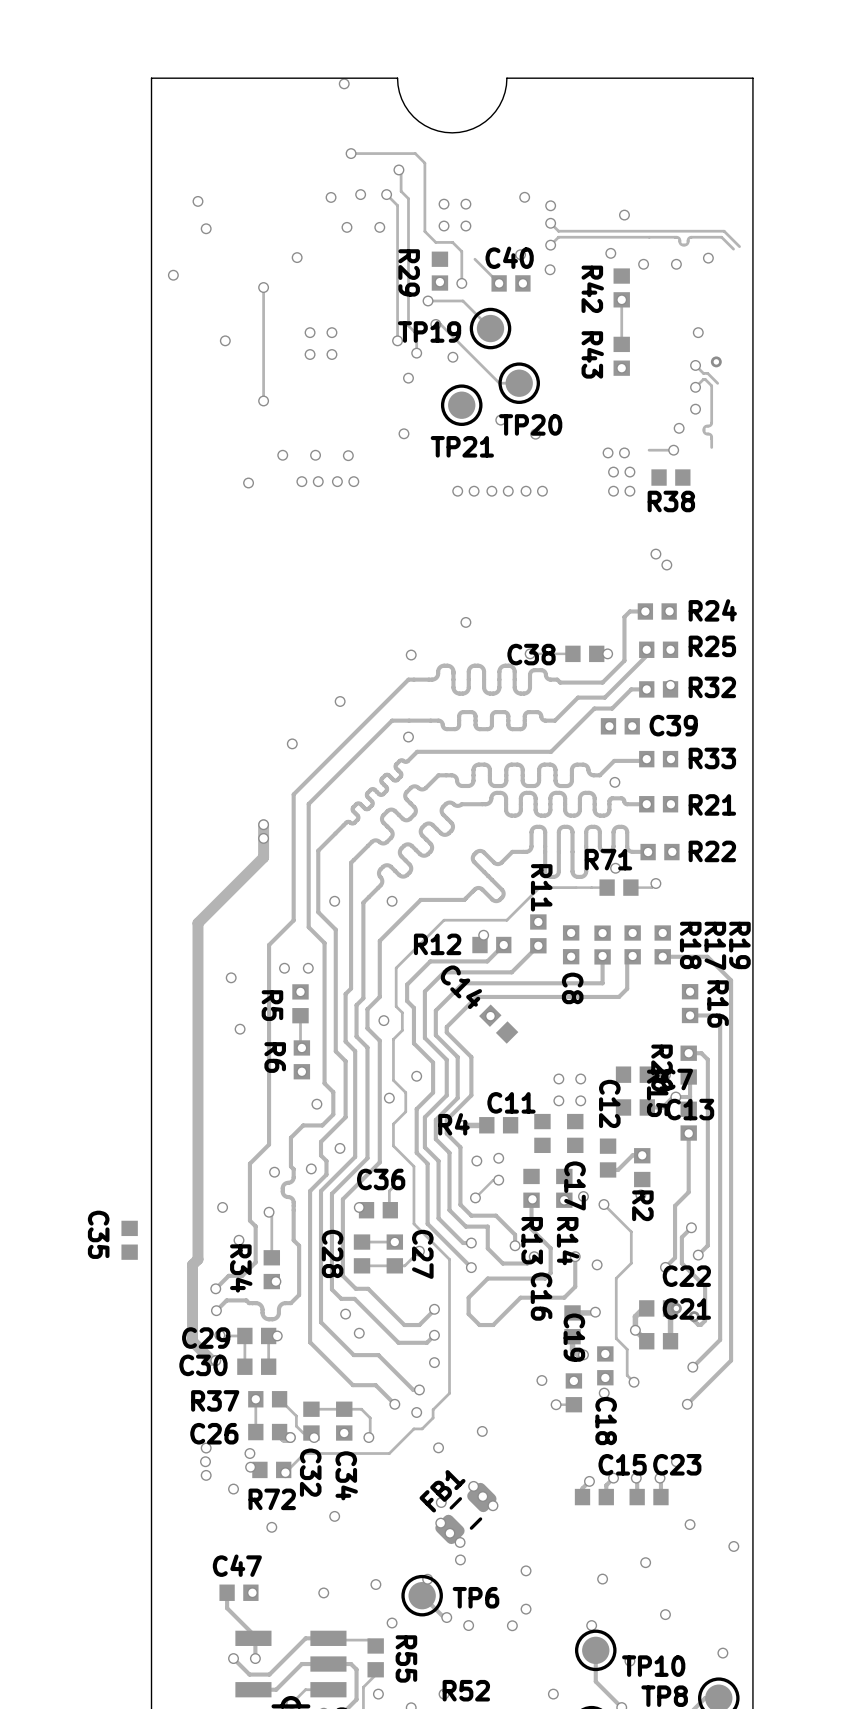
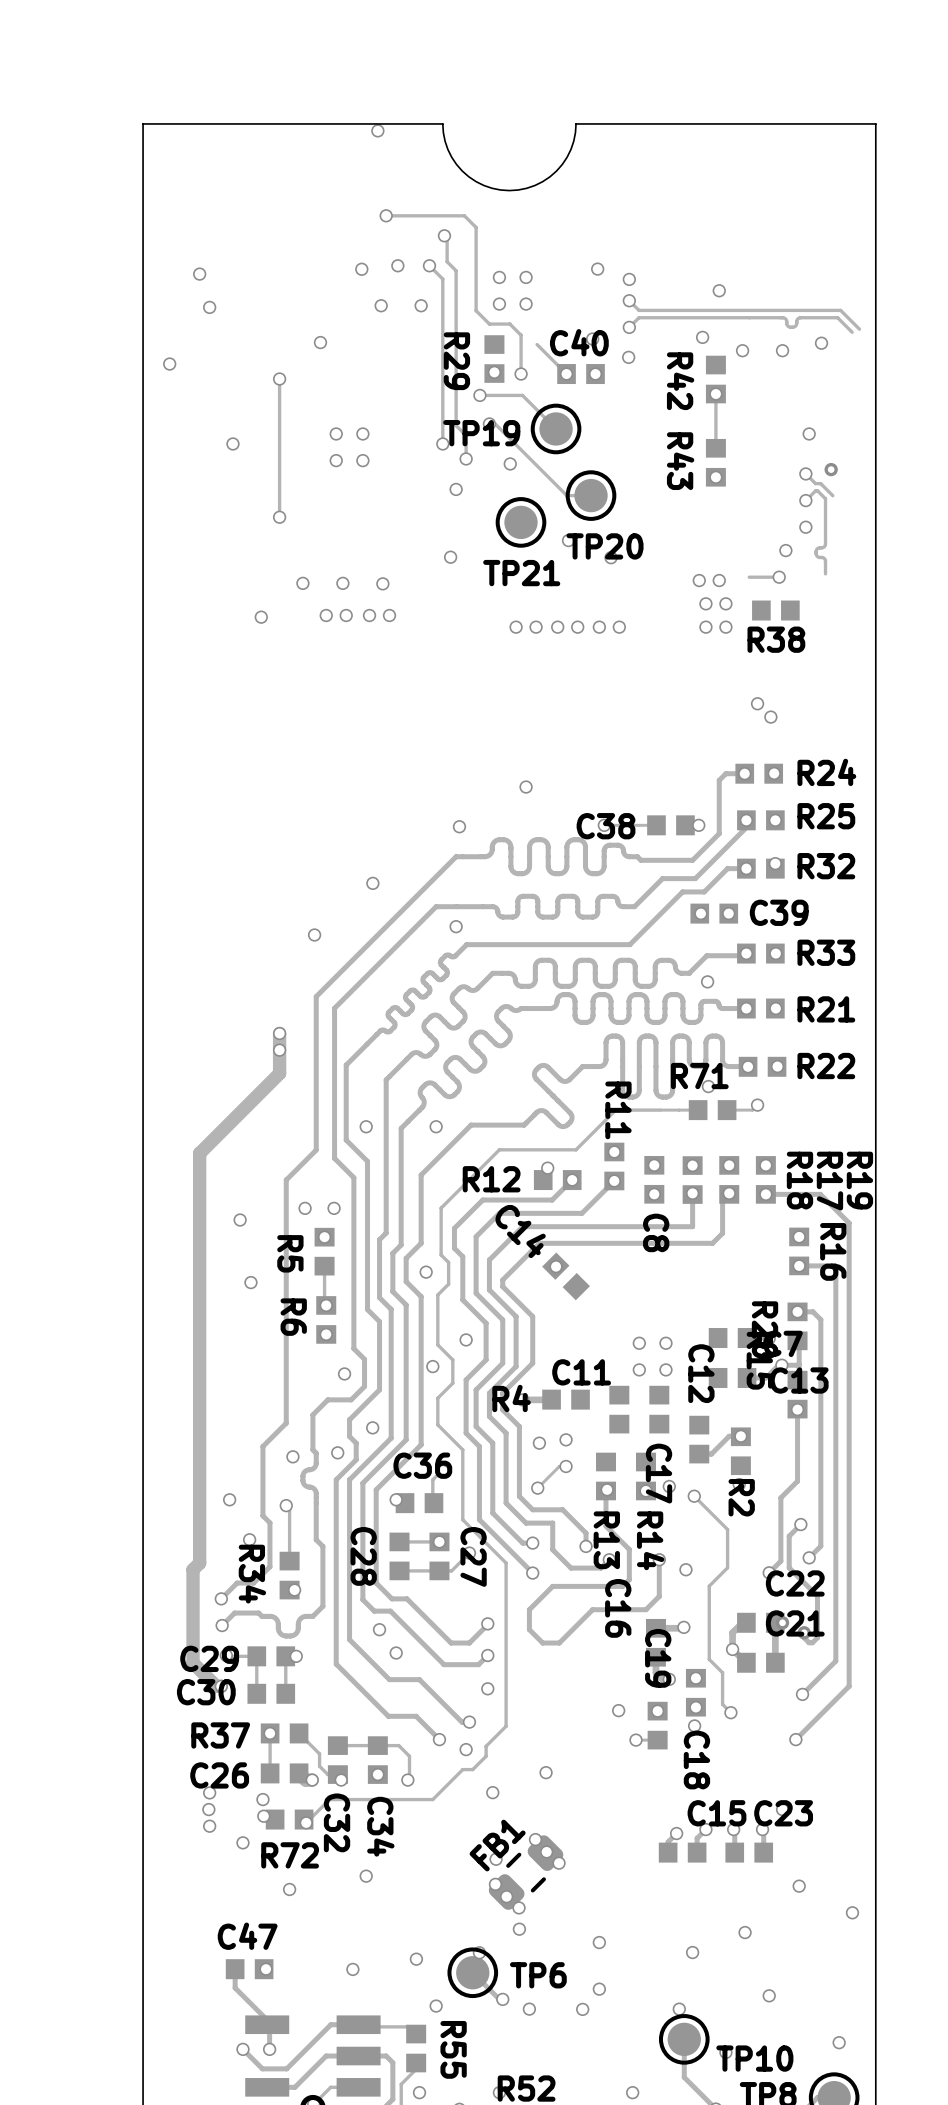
C35: (129, 1240) -> none

